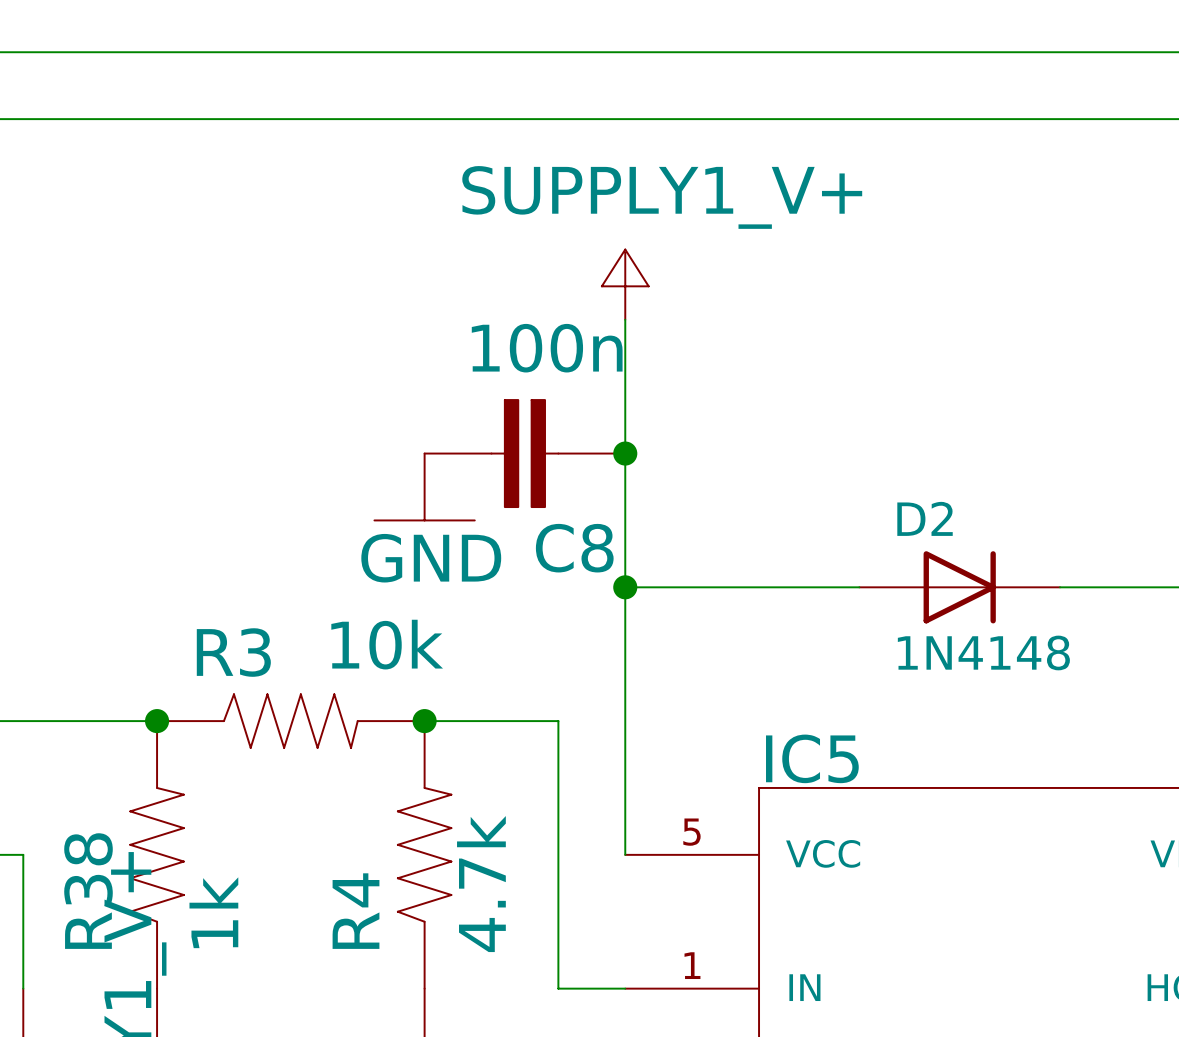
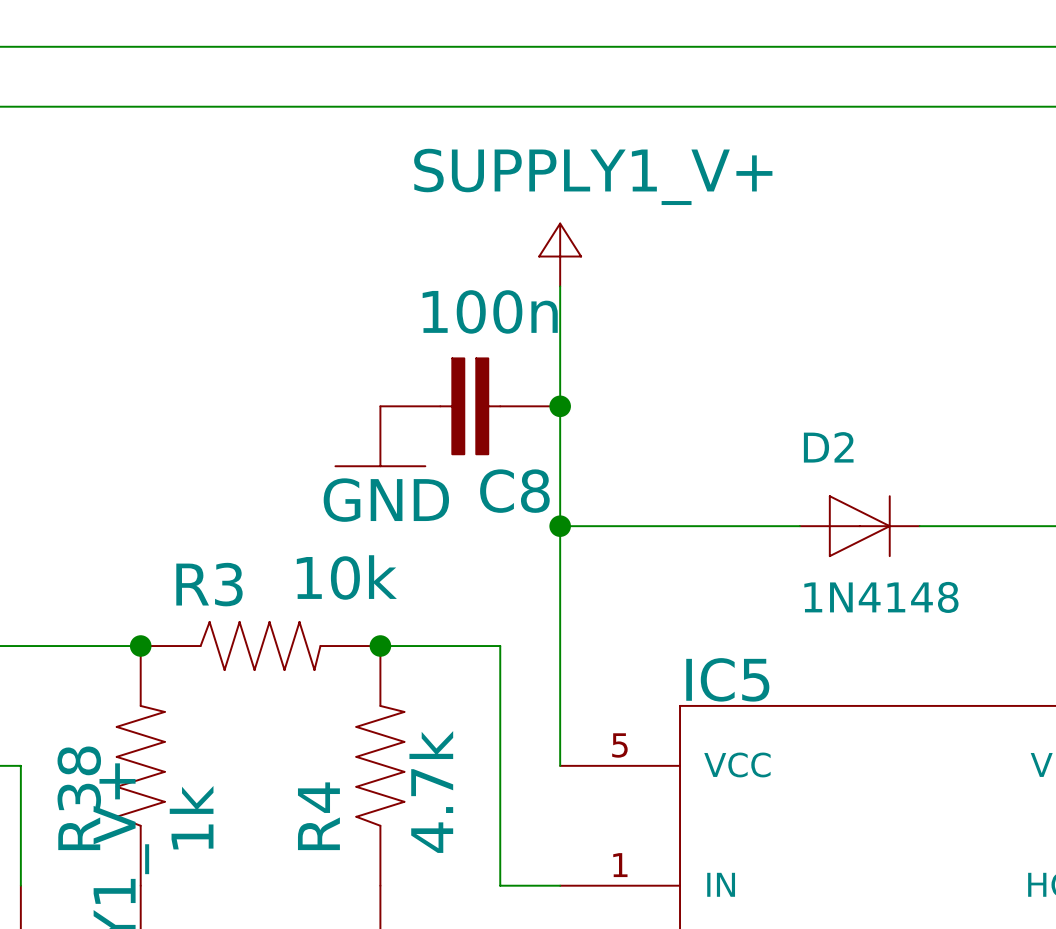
D2 symbol: [859, 551, 1061, 624] -> [799, 496, 920, 557]

